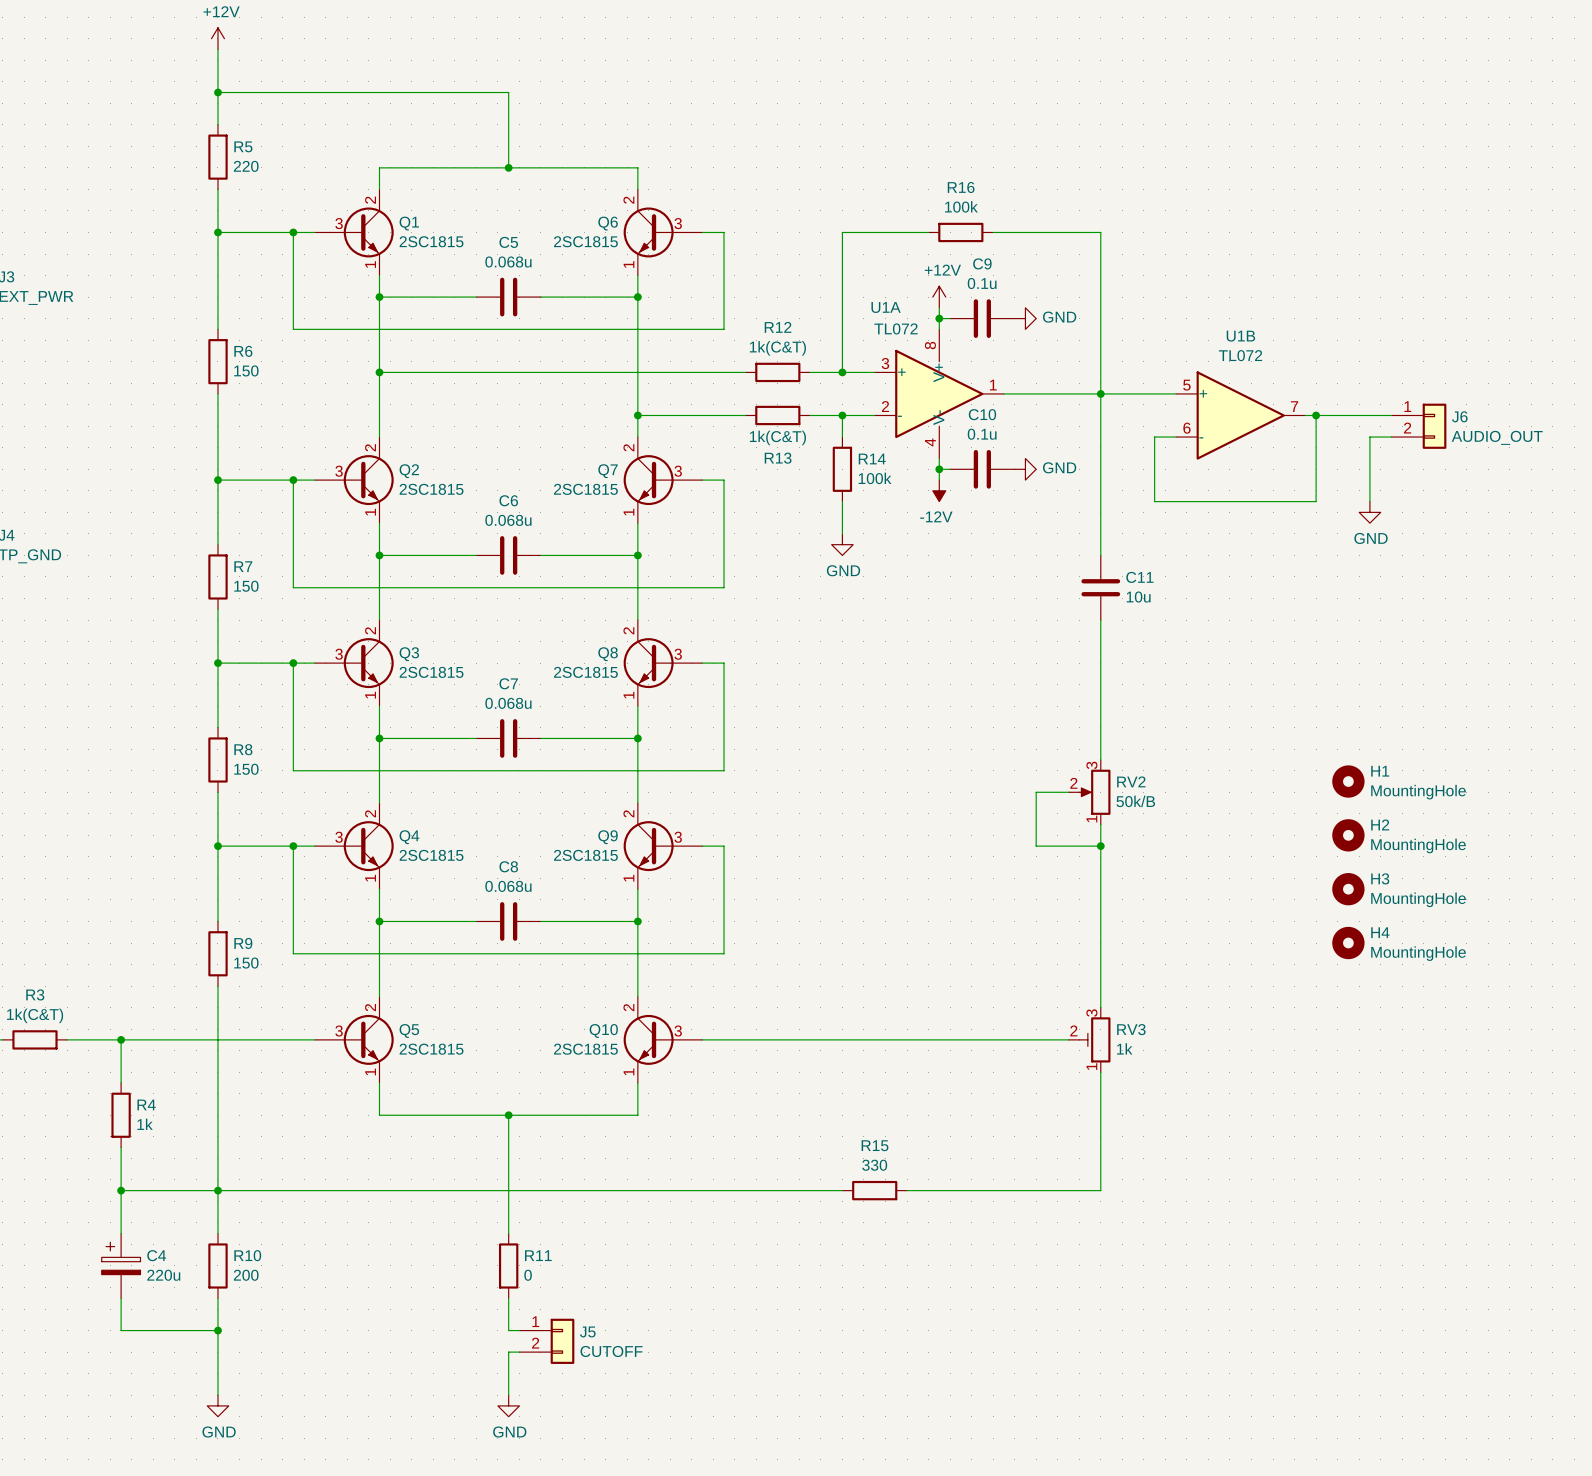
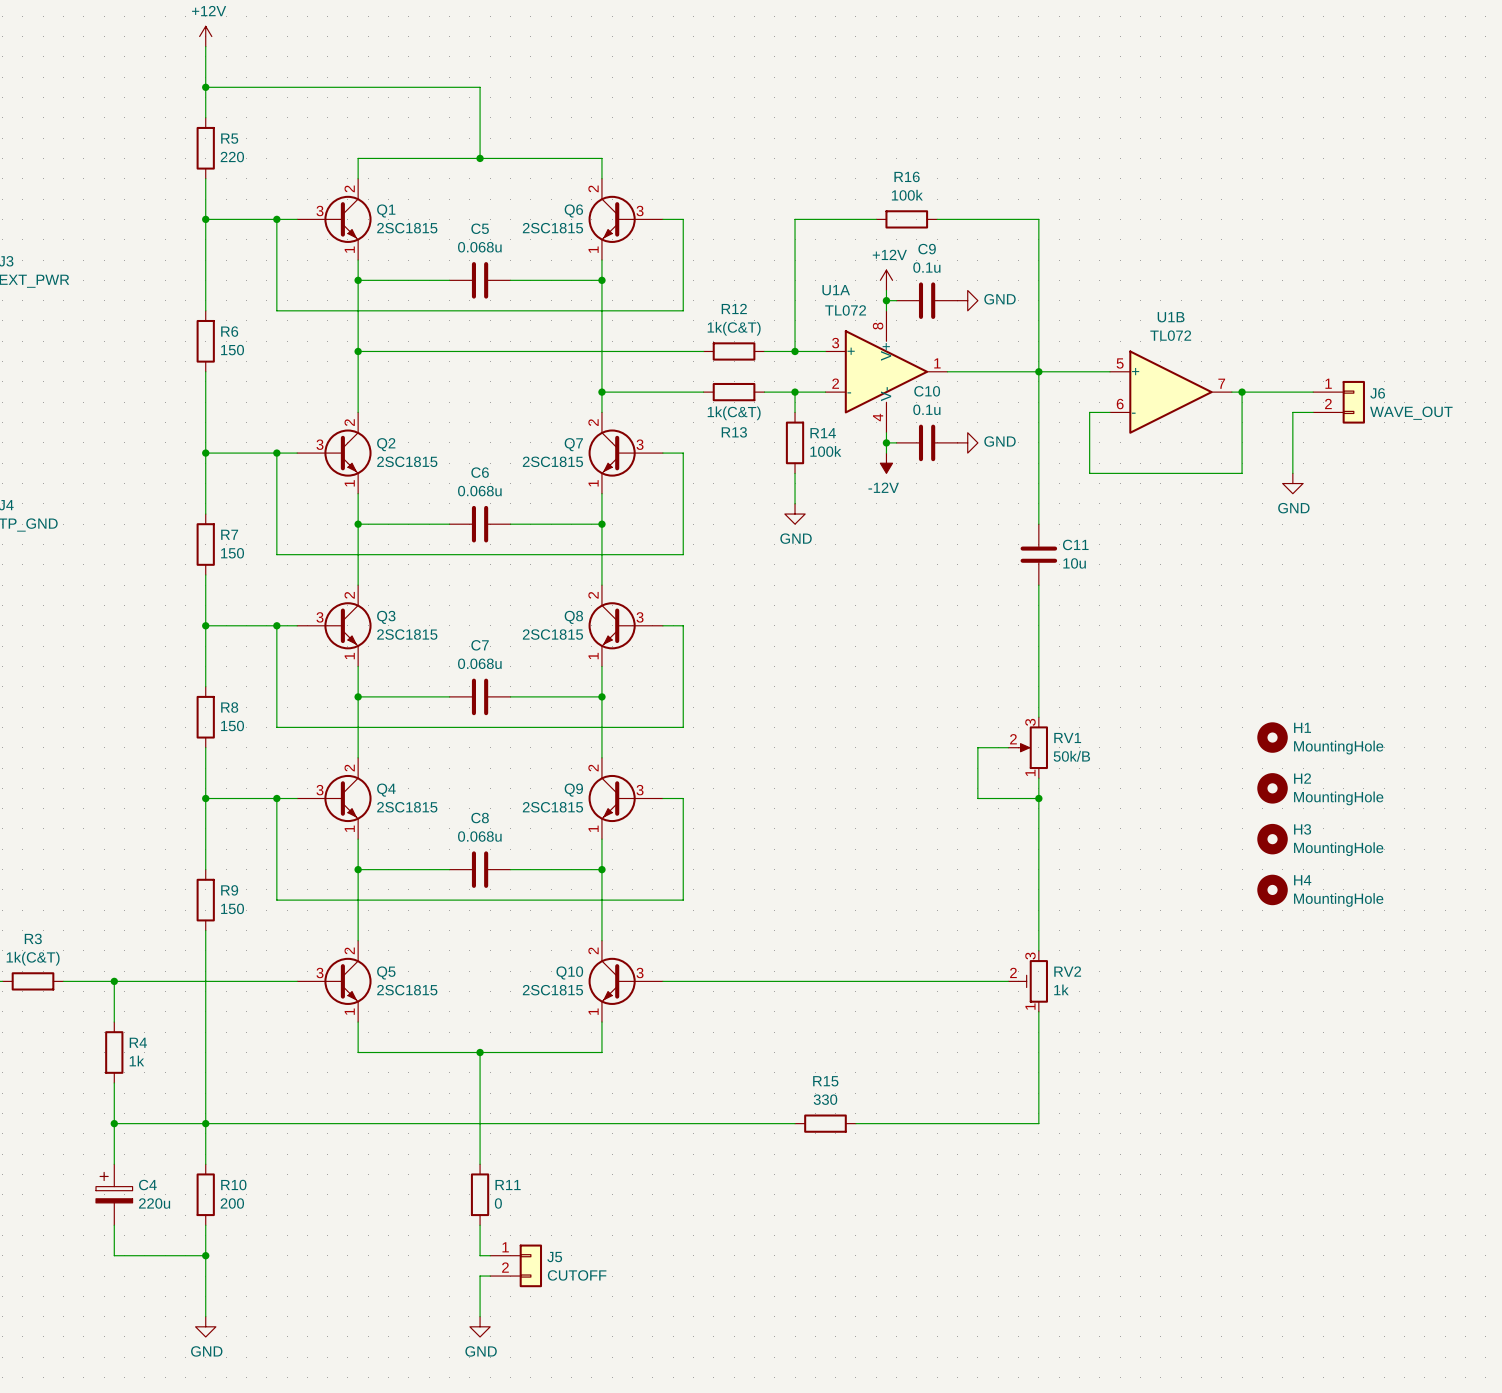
J6 value: AUDIO_OUT (1497, 437) -> WAVE_OUT (1411, 413)
RV2 name: RV2 (1131, 781) -> RV1 (1067, 737)
RV3 name: RV3 (1131, 1029) -> RV2 (1067, 971)

